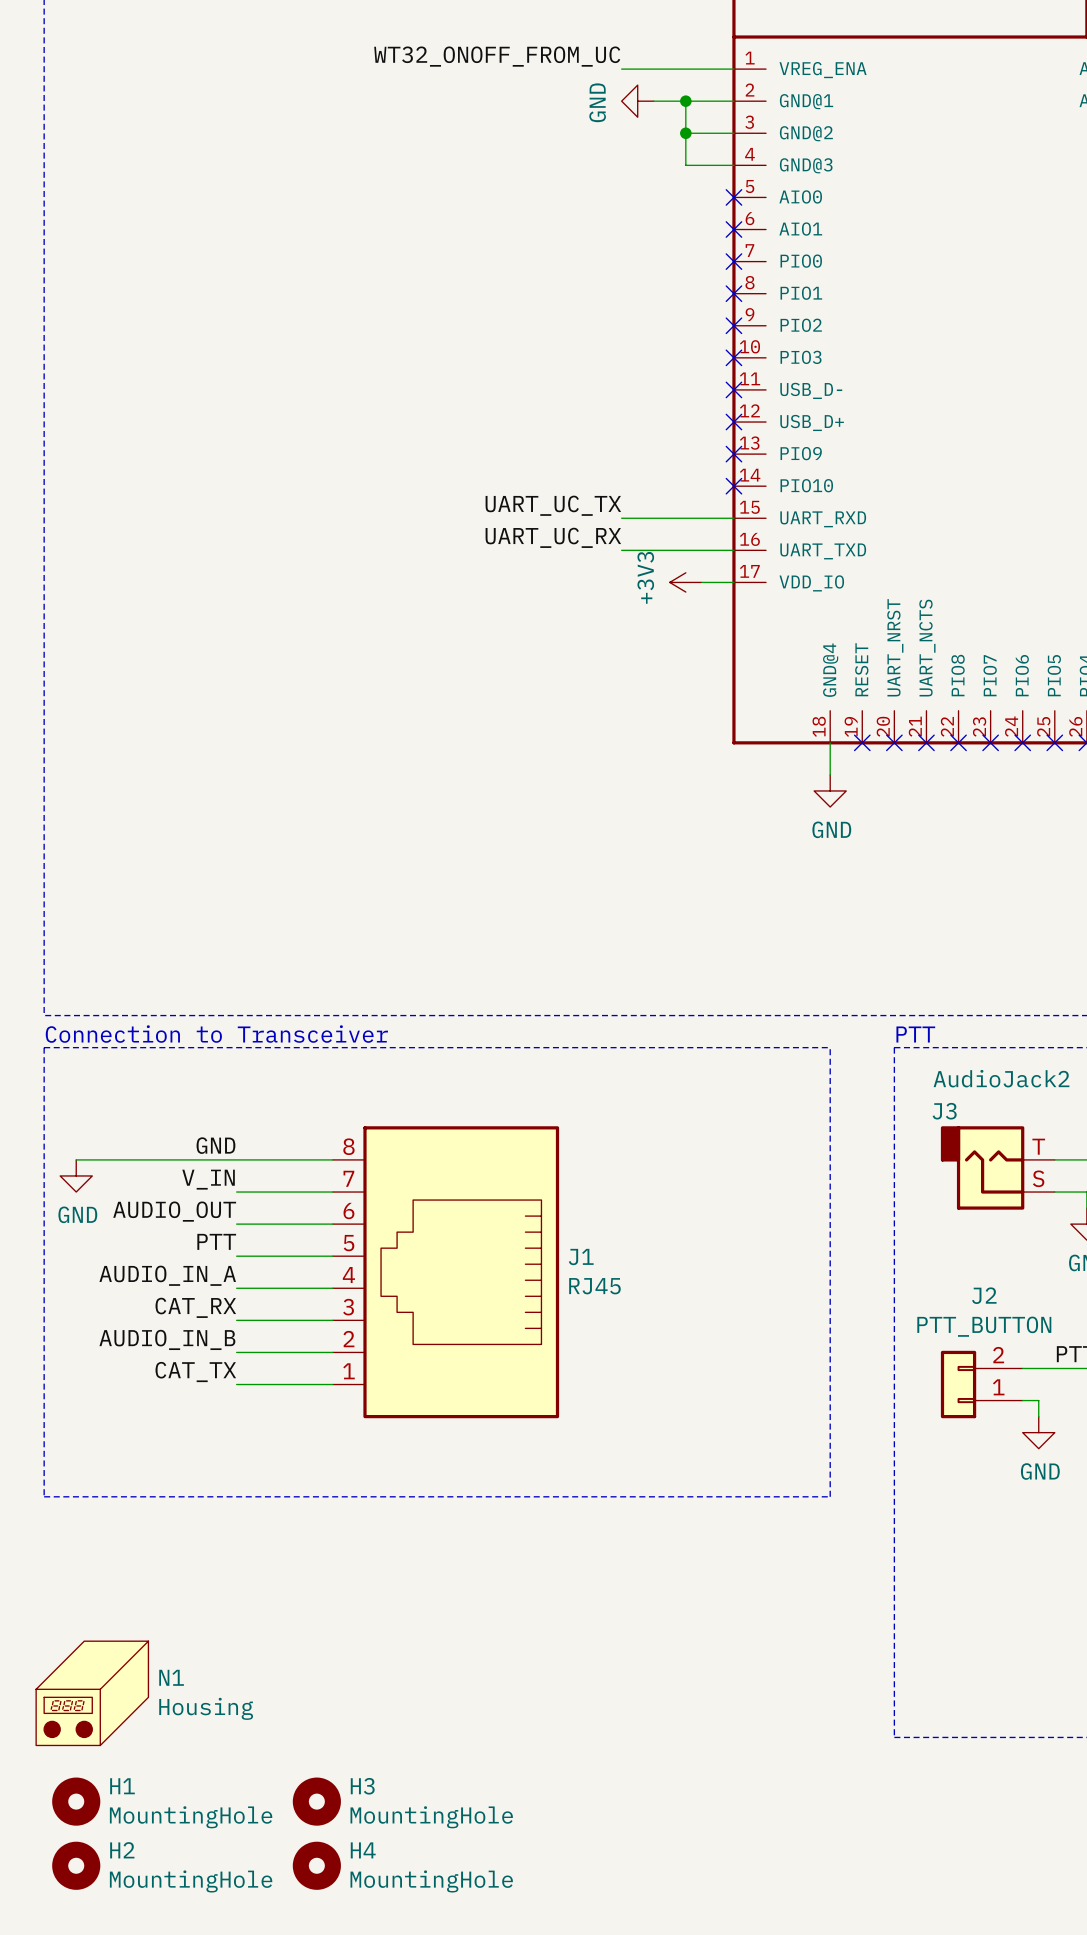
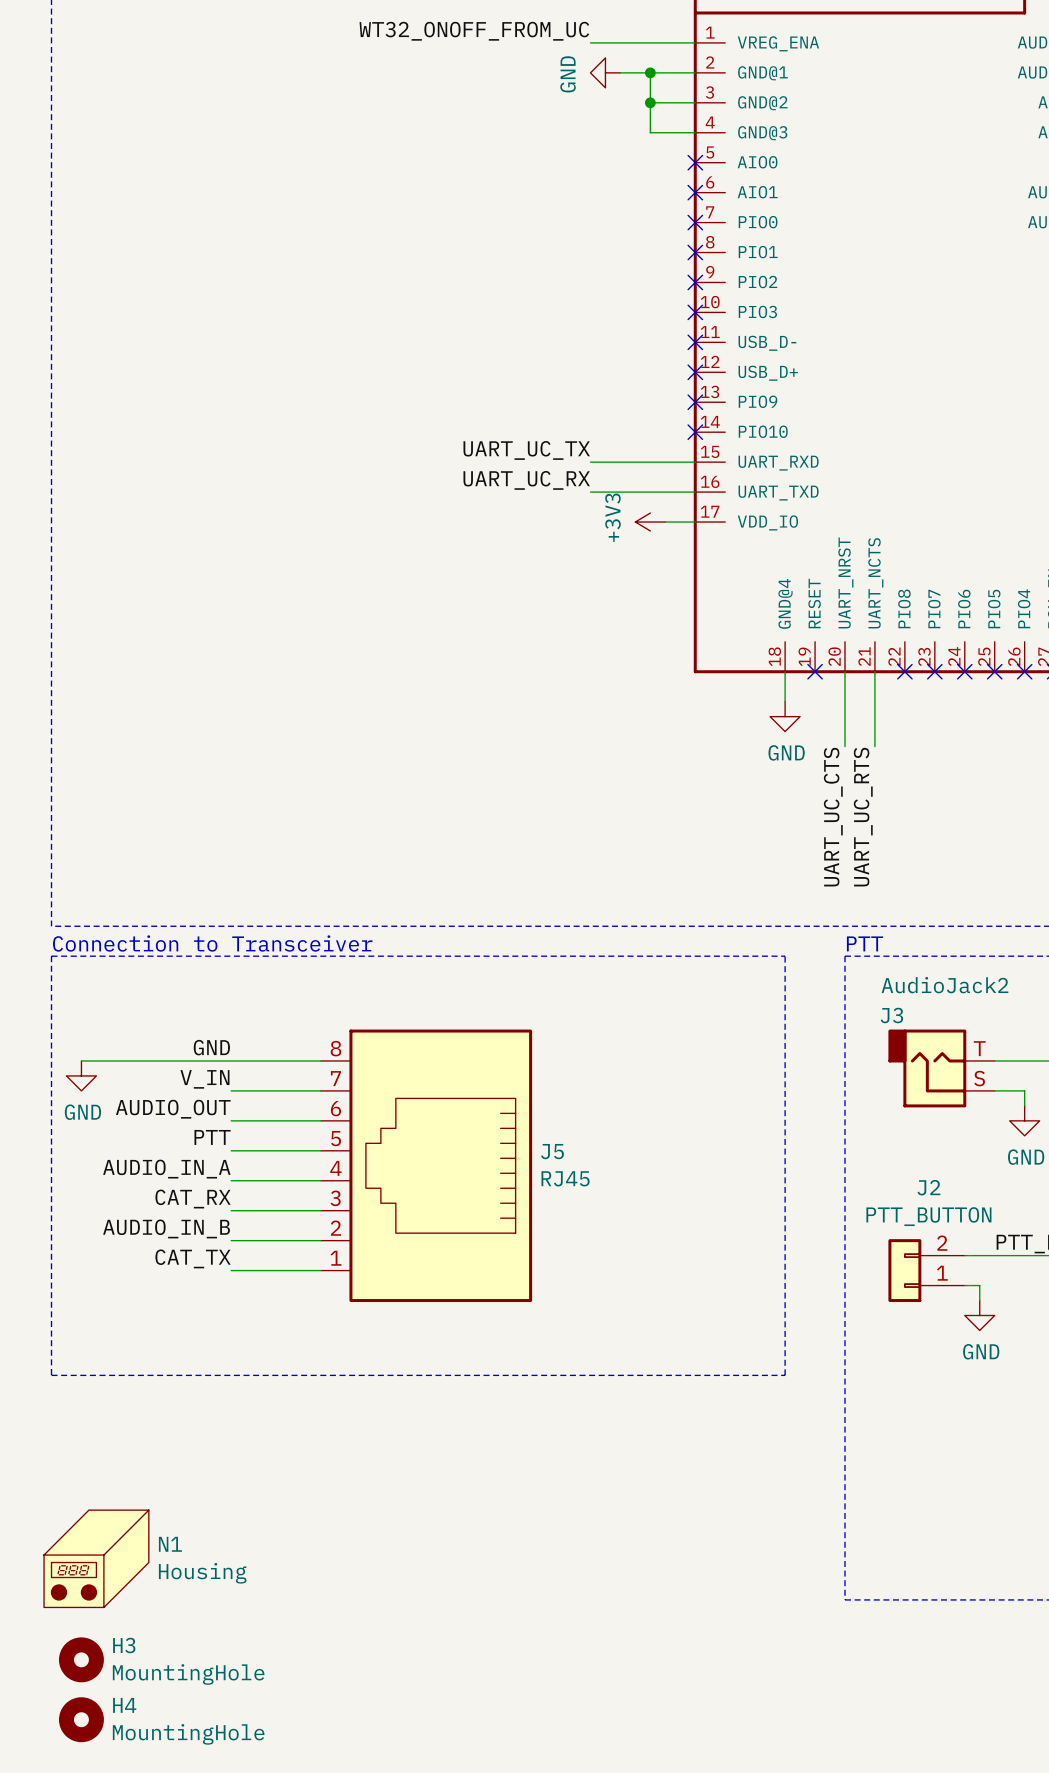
wire: none -> (844, 671) (844, 746)
no-connect mark: (894, 742) -> none
wire: none -> (874, 671) (874, 746)
no-connect mark: (926, 742) -> none
label: none -> UART_UC_CTS (833, 817)
label: none -> UART_UC_RTS (863, 817)
J1 name: J1 (581, 1257) -> J5 (552, 1151)
H1 name: H1 (122, 1786) -> H3 (124, 1645)
H3: MountingHole (316, 1801) -> none
H2 name: H2 (122, 1850) -> H4 (124, 1705)
H4: MountingHole (316, 1865) -> none

